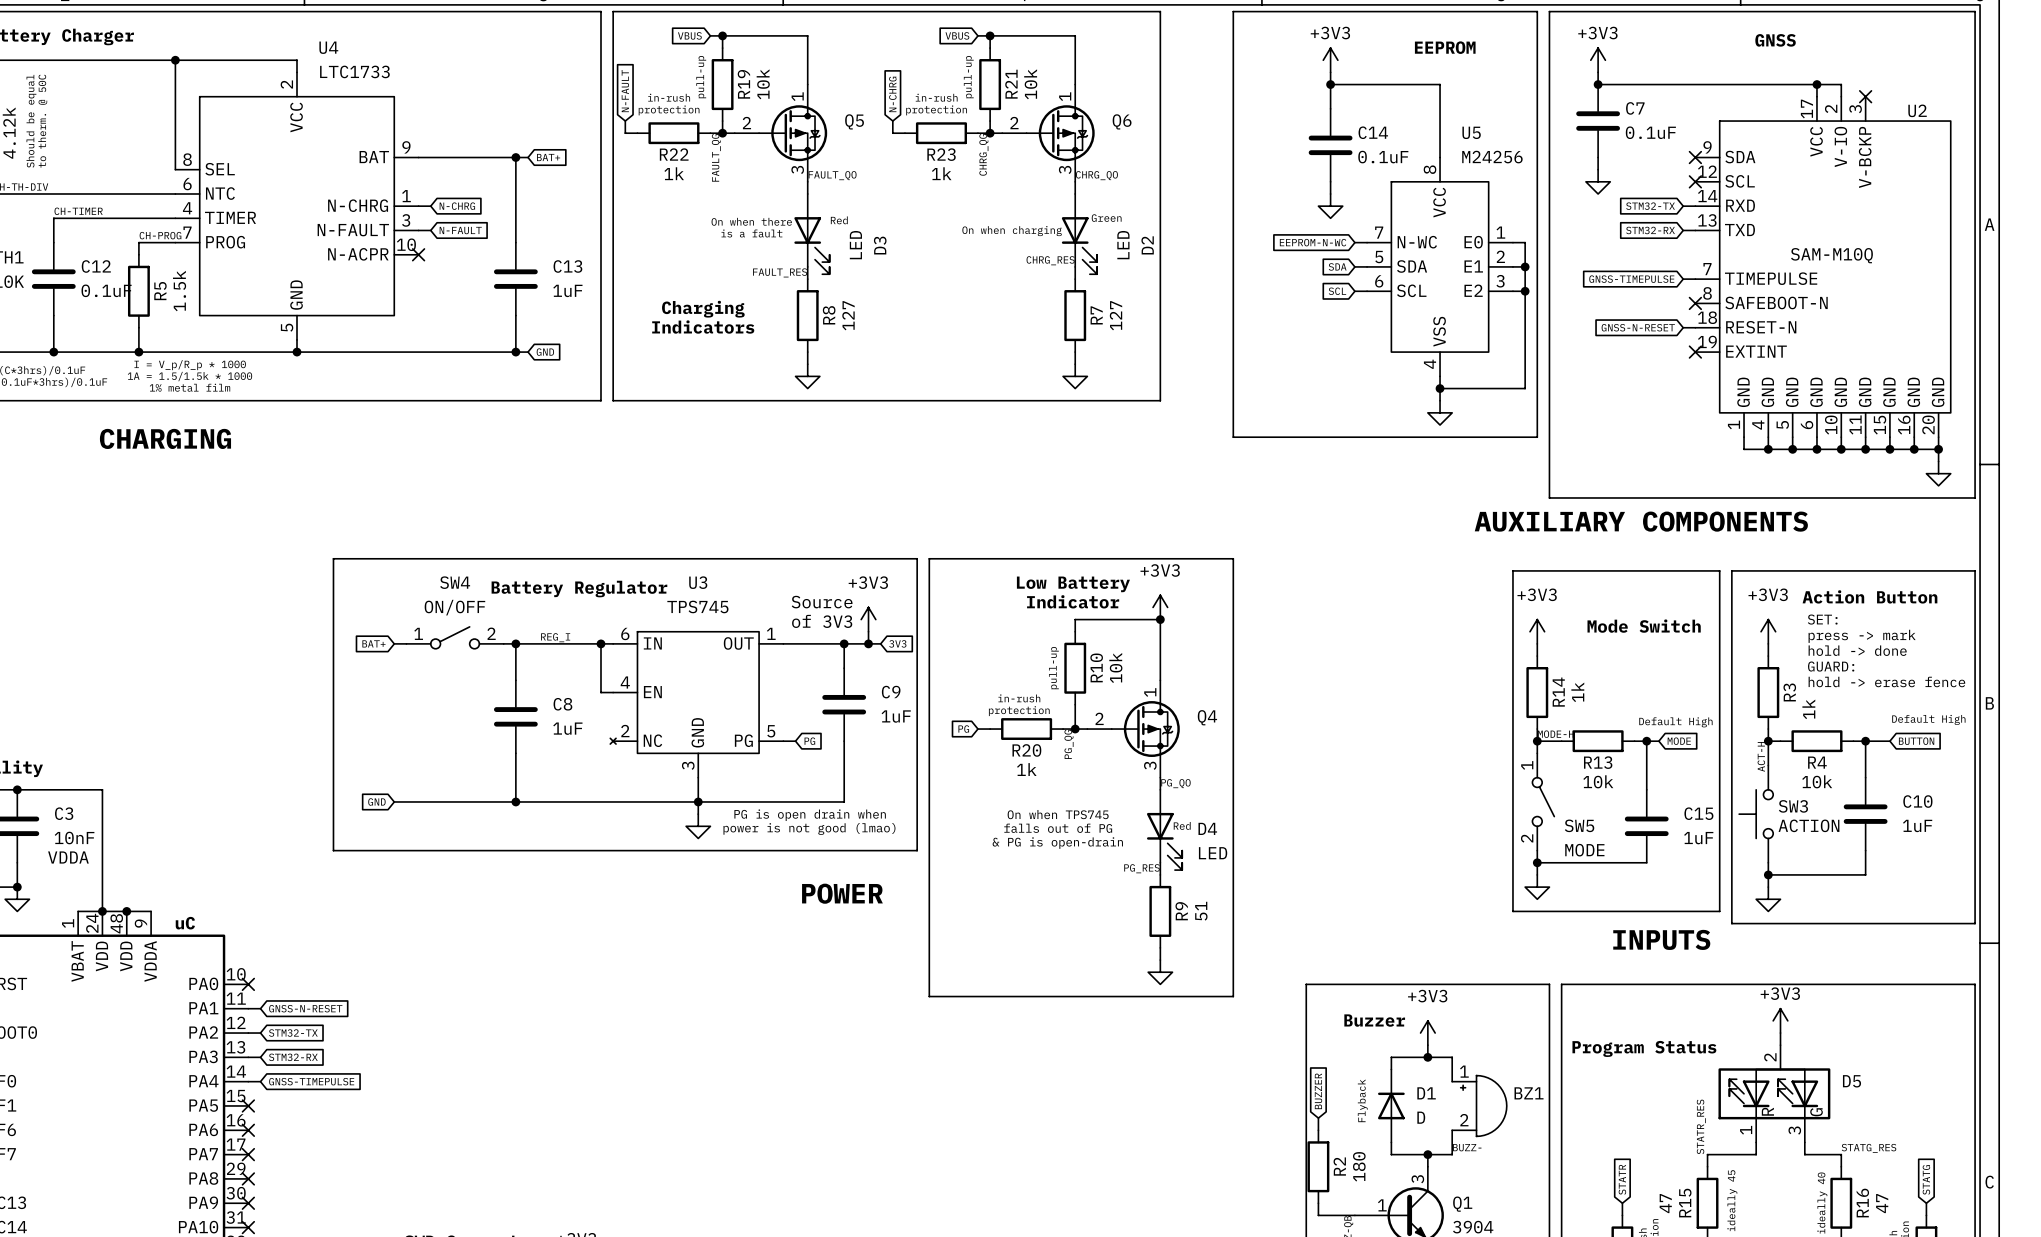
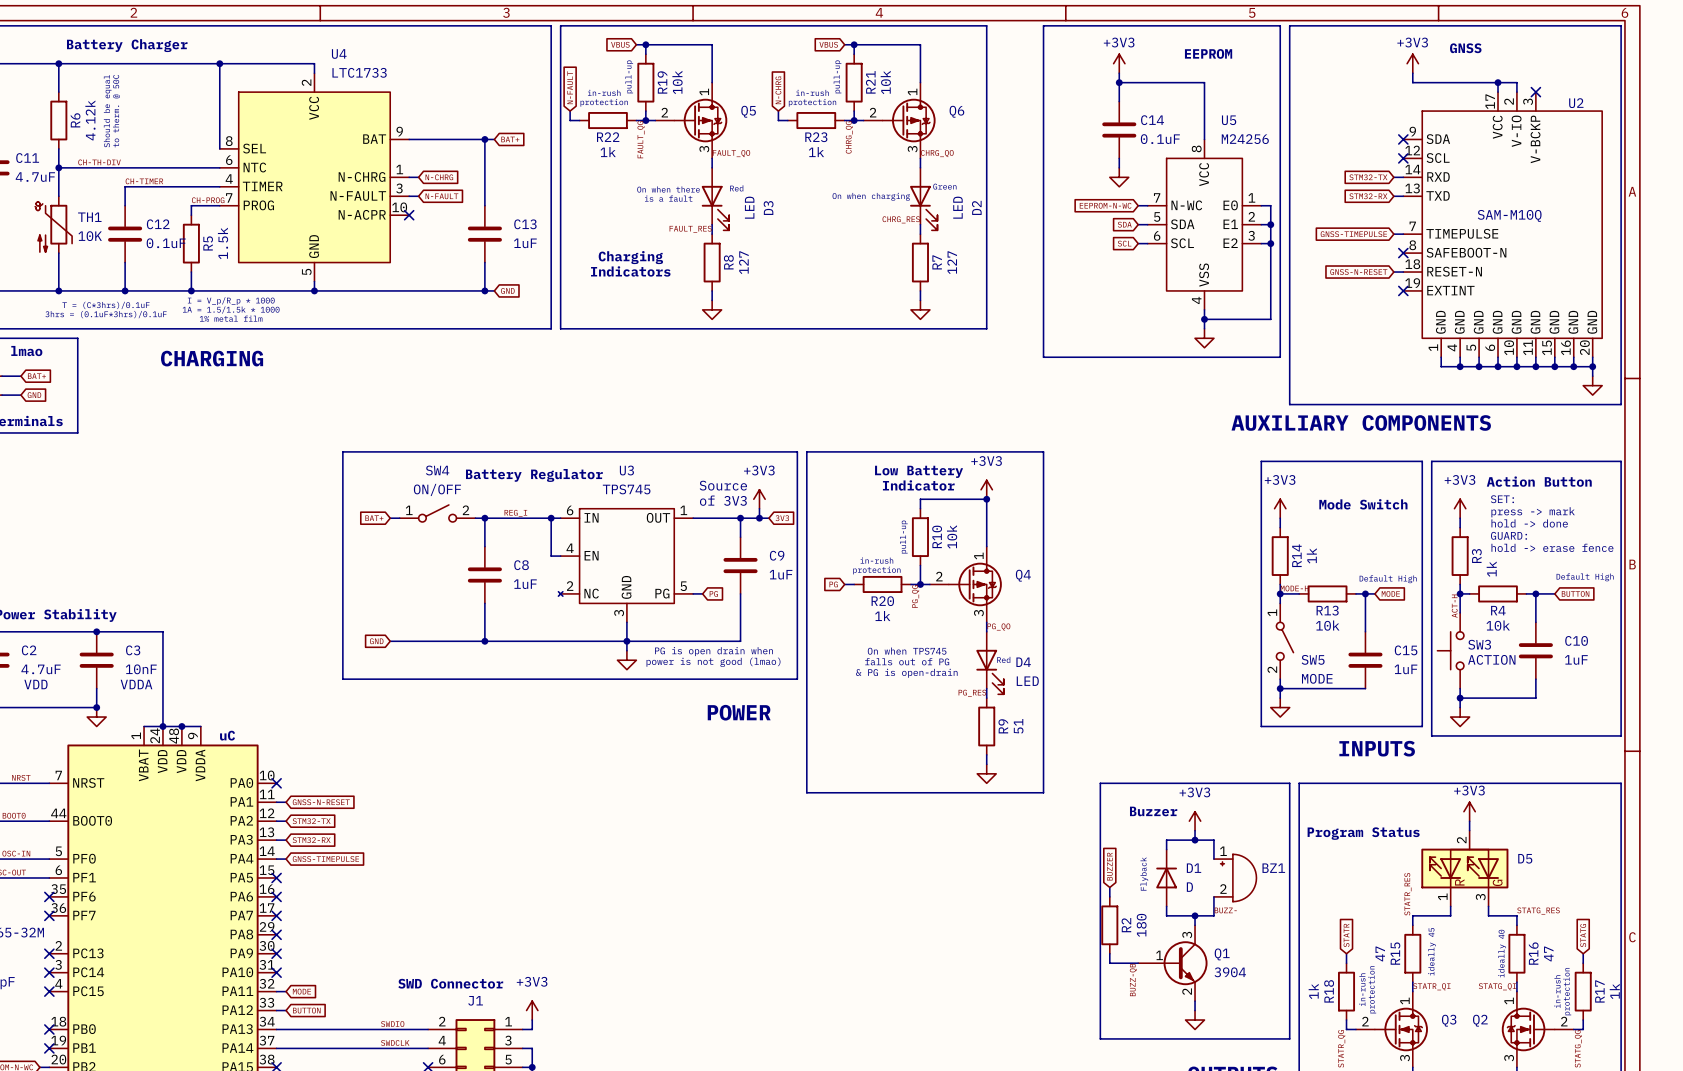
power symbol position: +3V3 (1598, 60) -> +3V3 (1412, 63)
wire: (1598, 72) (1598, 84) (1707, 84) -> (1412, 73) (1412, 82)
junction: (1598, 84) -> none
C7: 0.1uF (1598, 121) -> none
wire: (1598, 157) (1598, 169) -> none
power symbol: (1598, 181) -> none

